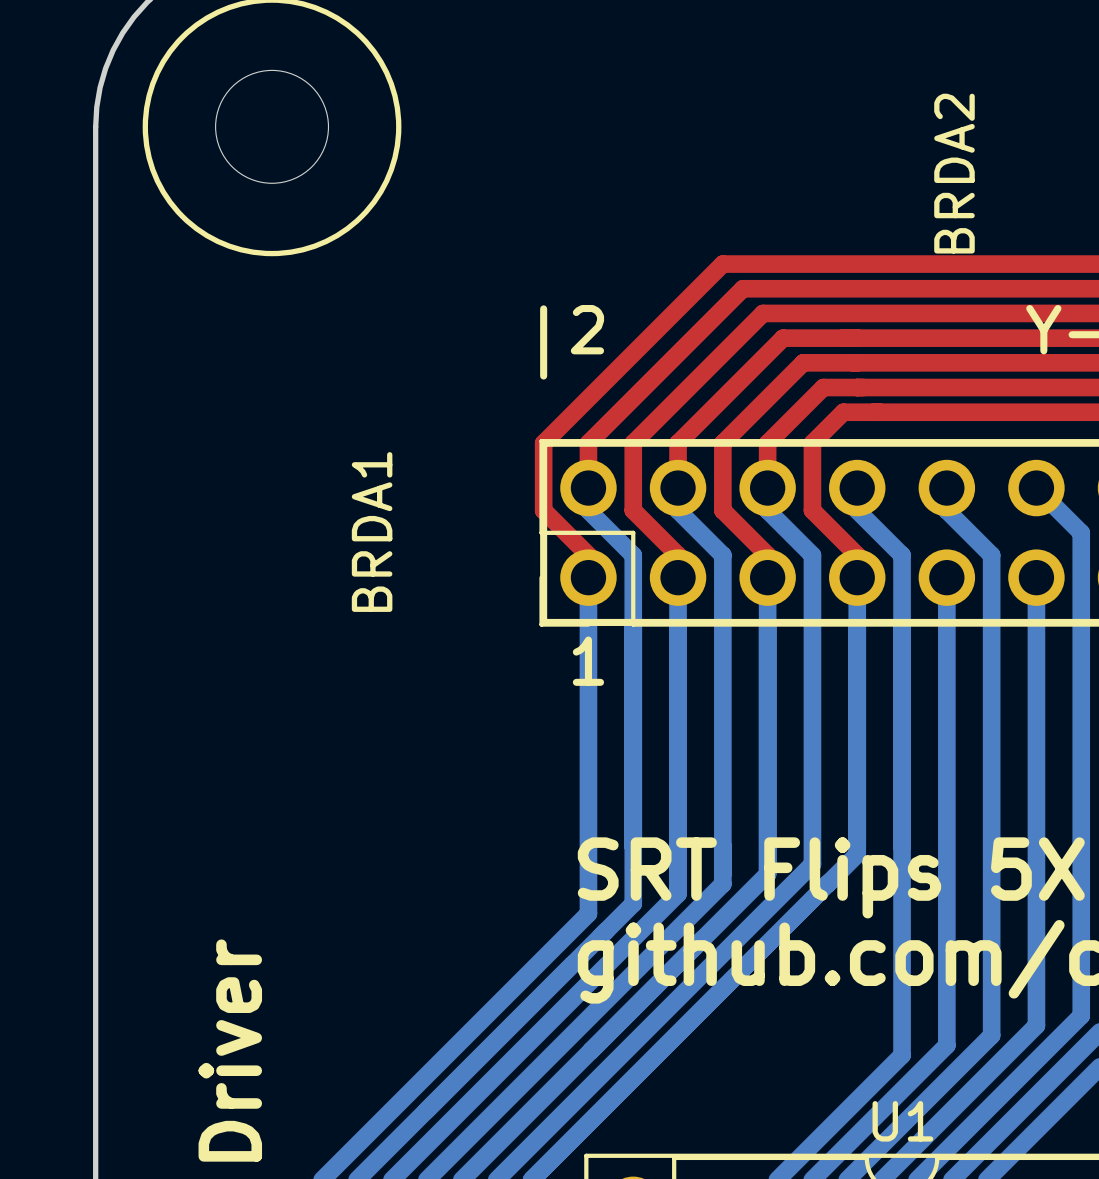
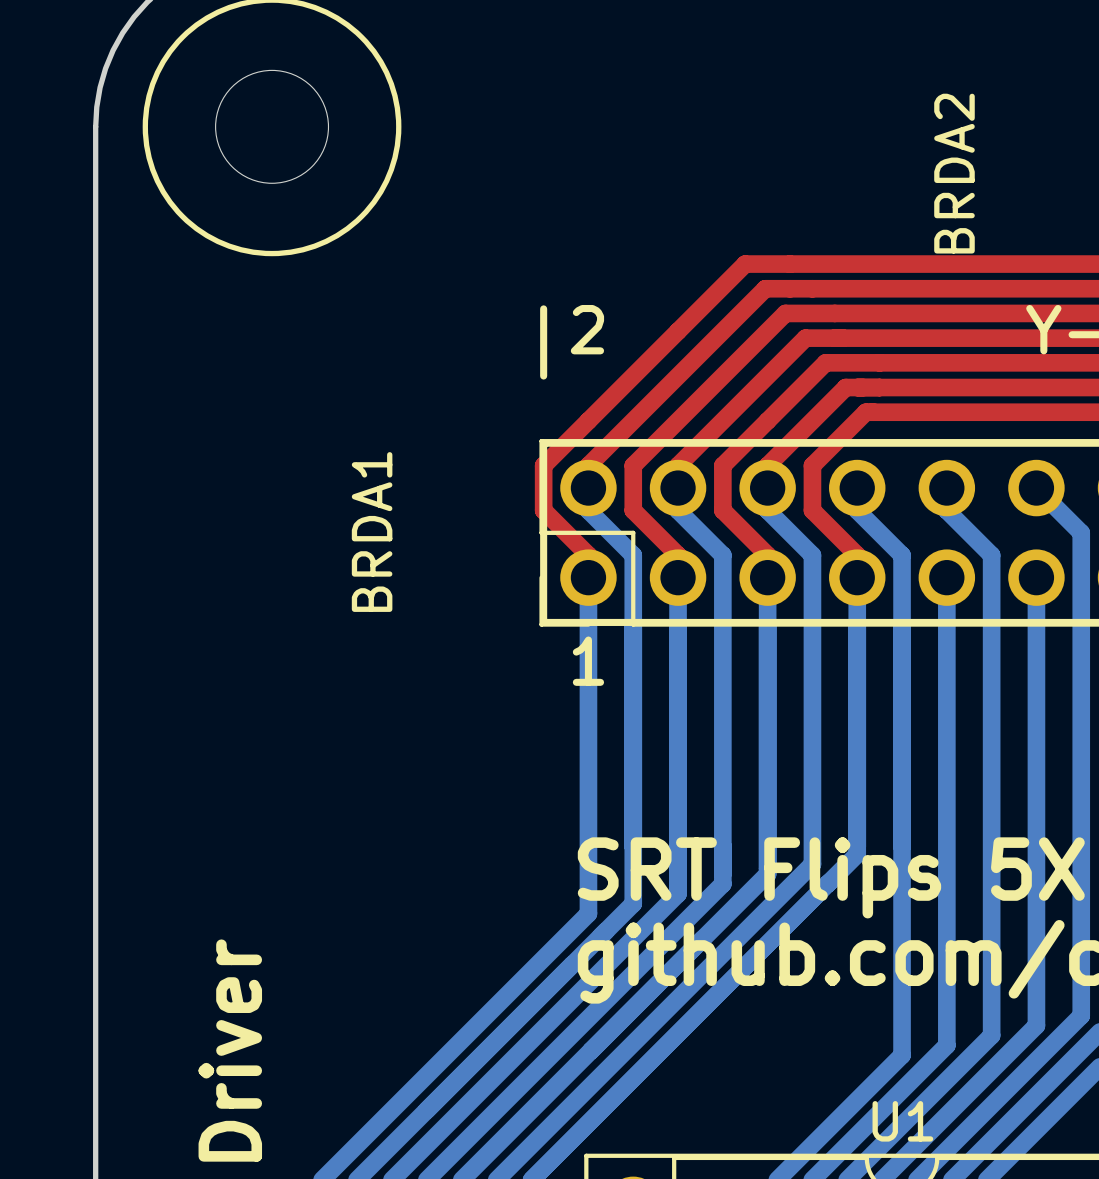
top track: (745, 264) (722, 264) (543, 443) (543, 465) -> (745, 264) (543, 465)
top track: (765, 288) (742, 288) (588, 443) (588, 465) -> (765, 288) (588, 465)
top track: (785, 313) (763, 313) (633, 443) (633, 465) -> (785, 313) (633, 465)
top track: (805, 338) (783, 338) (678, 443) (678, 465) -> (805, 338) (678, 465)
top track: (825, 362) (803, 362) (722, 443) (722, 465) -> (825, 362) (722, 465)
top track: (845, 387) (823, 387) (767, 443) (767, 465) -> (845, 387) (767, 465)
top track: (865, 412) (843, 412) (812, 443) (812, 465) -> (865, 412) (812, 465)

